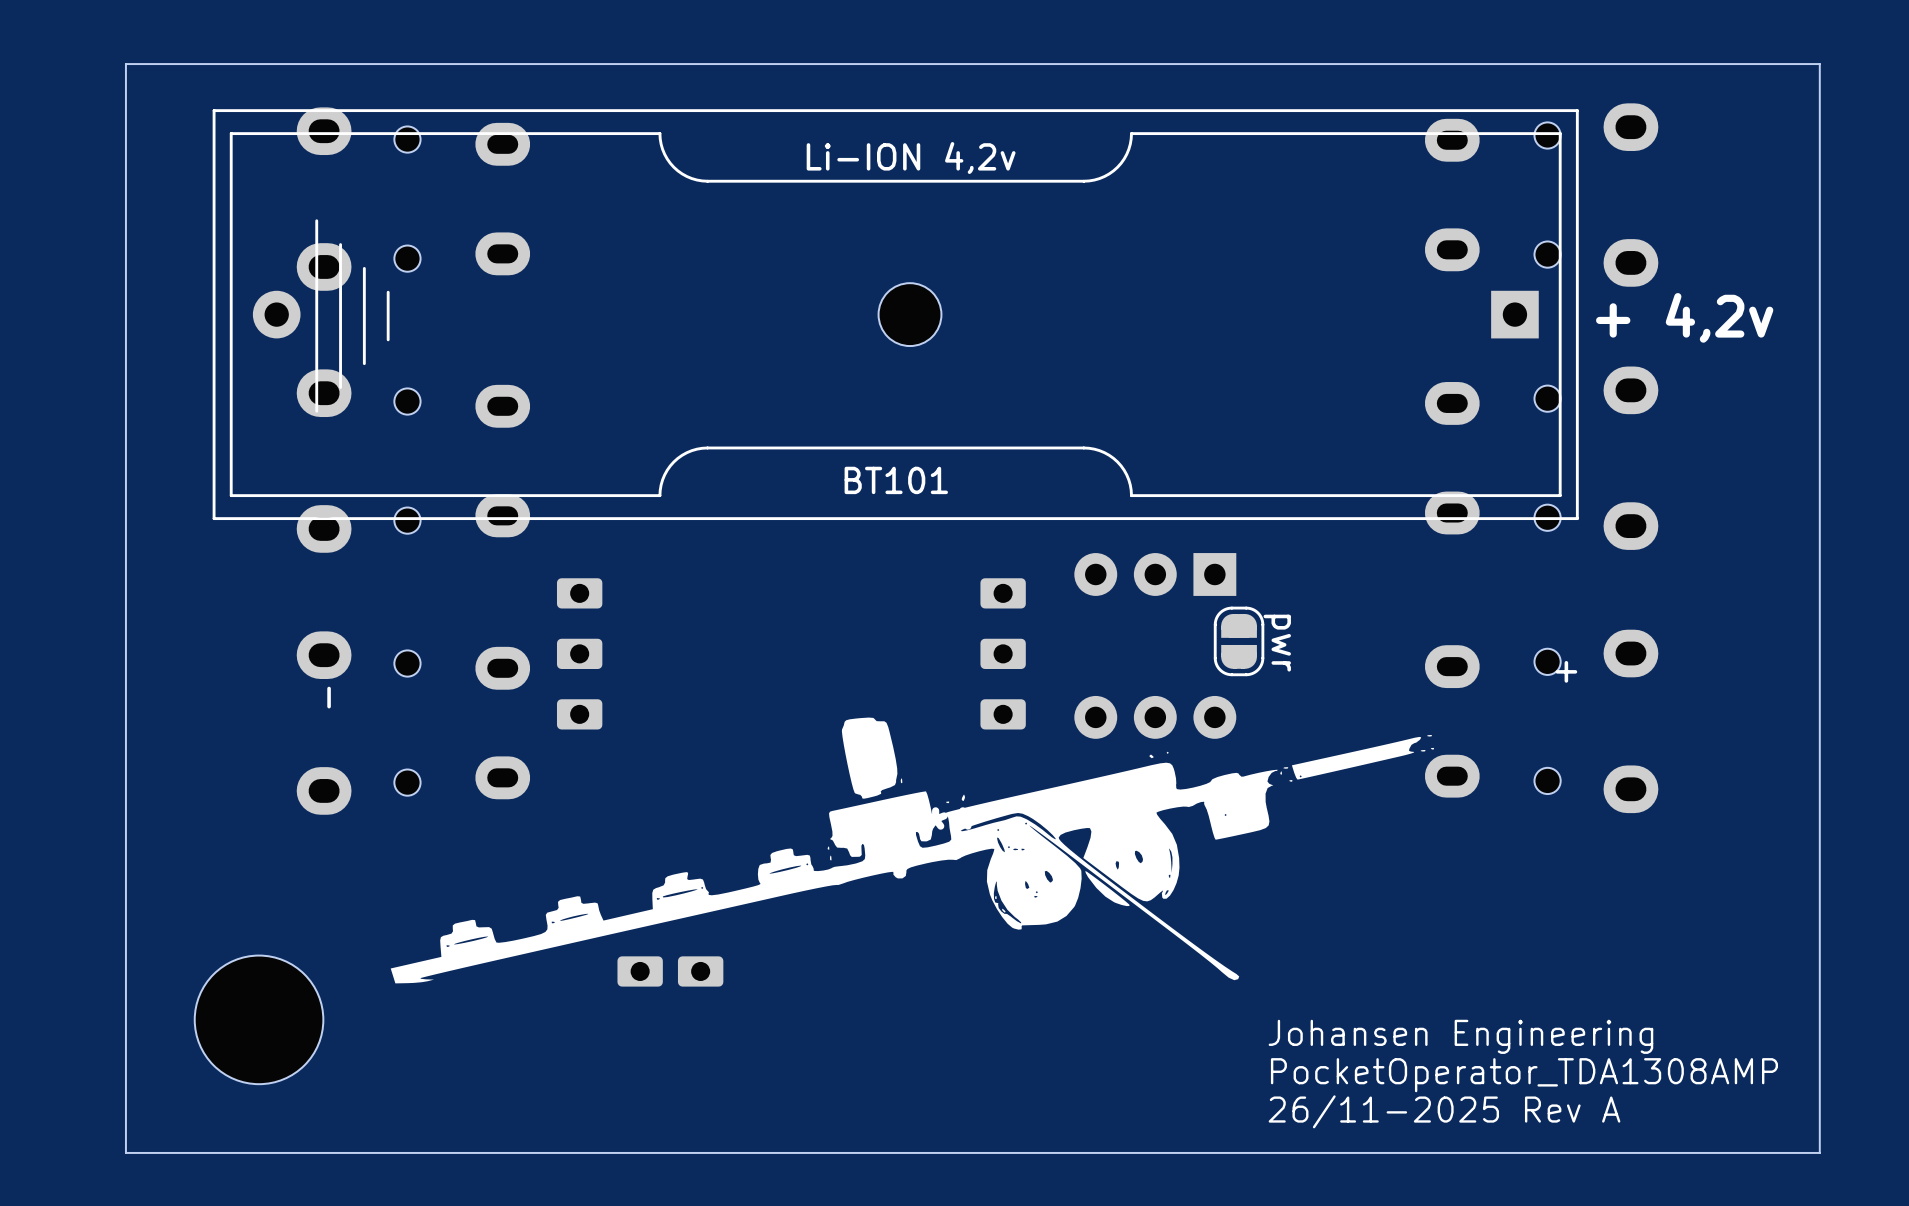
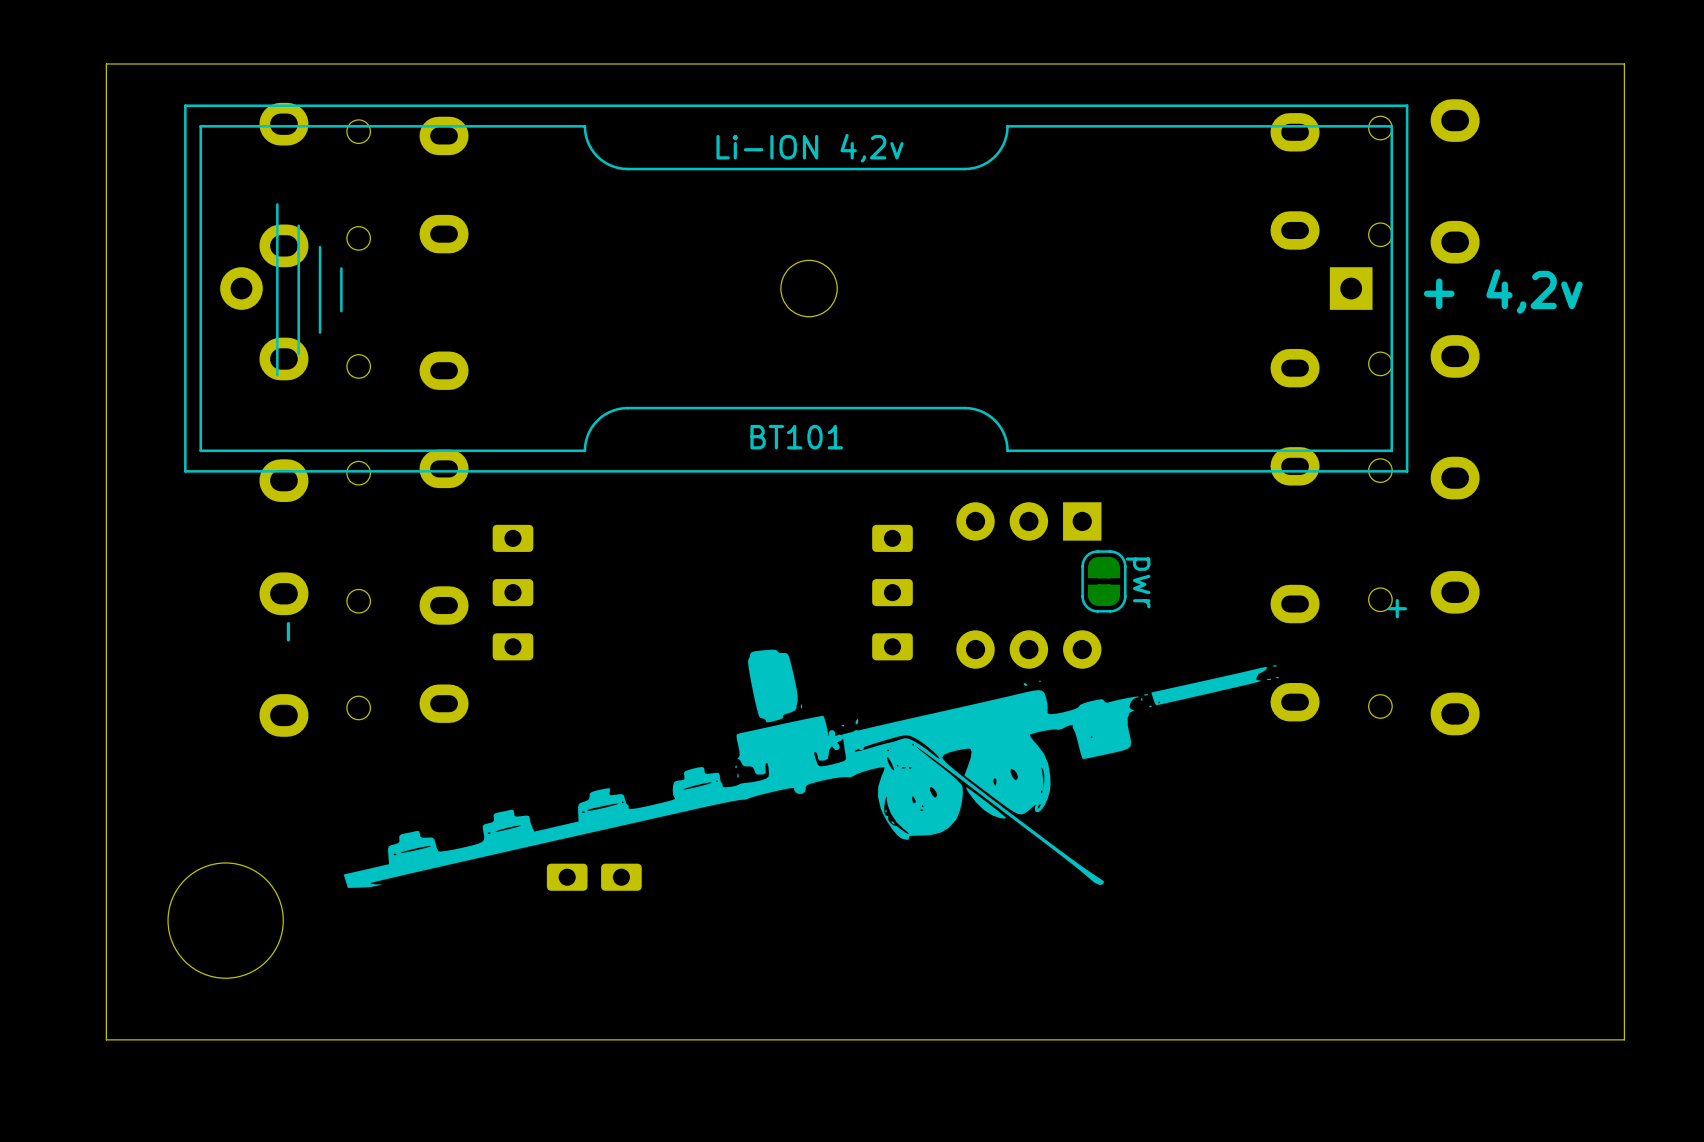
text: Johansen Engineering (1460, 1036) -> none
text: PocketOperator_TDA1308AMP (1524, 1075) -> none
text: 26/11-2025 Rev A (1444, 1111) -> none

